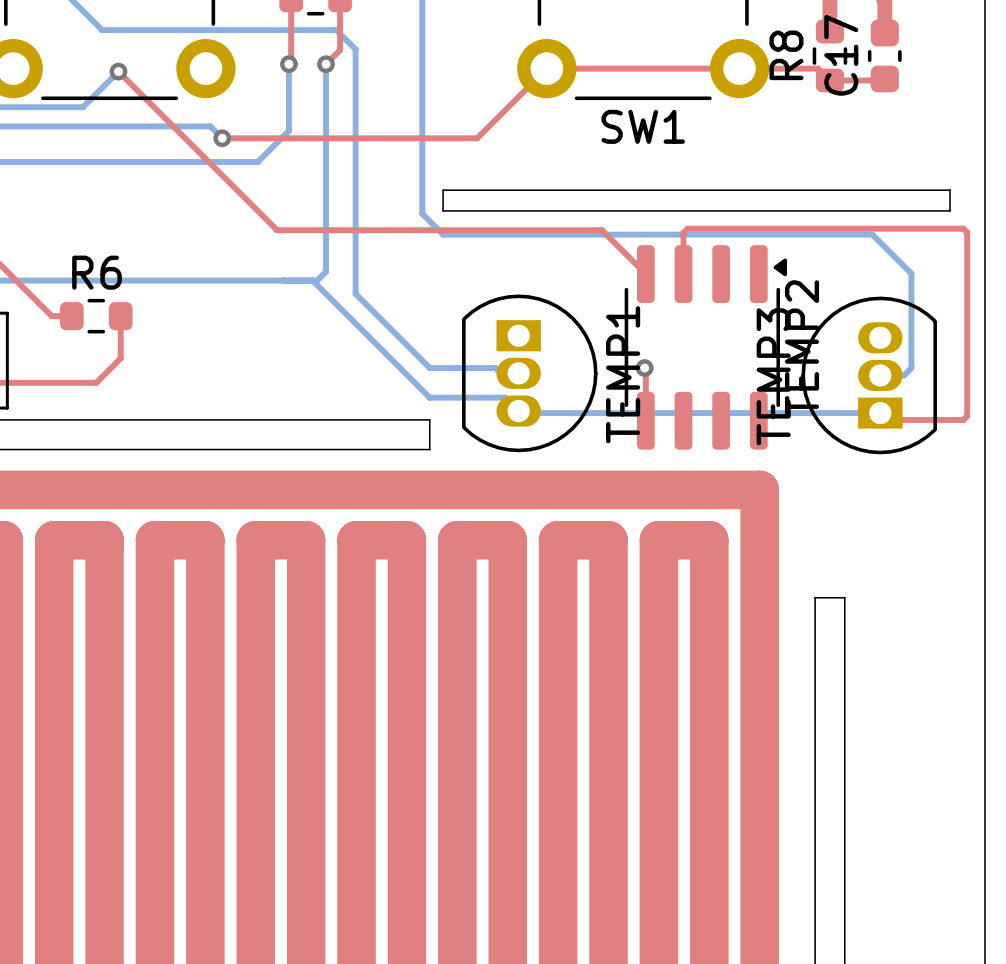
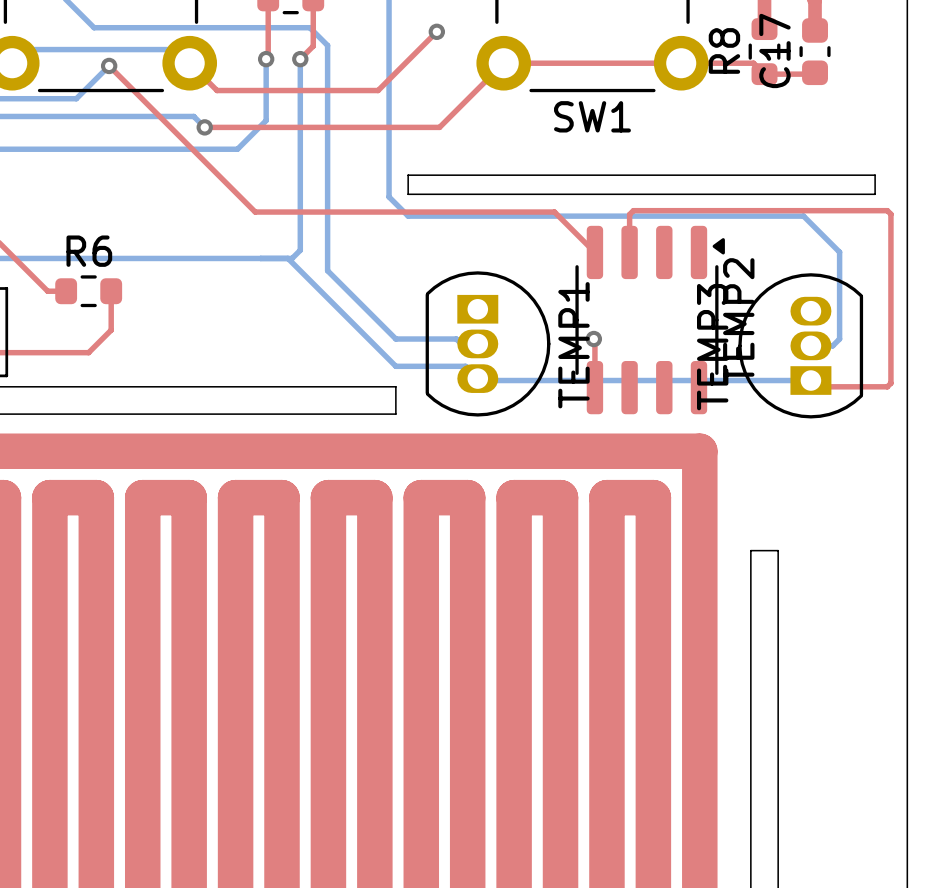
top track: none -> (436, 31) (378, 90) (217, 90) (189, 63)
via: none -> (436, 31)
bottom track: none -> (12, 63) (25, 49) (176, 49) (189, 63)

